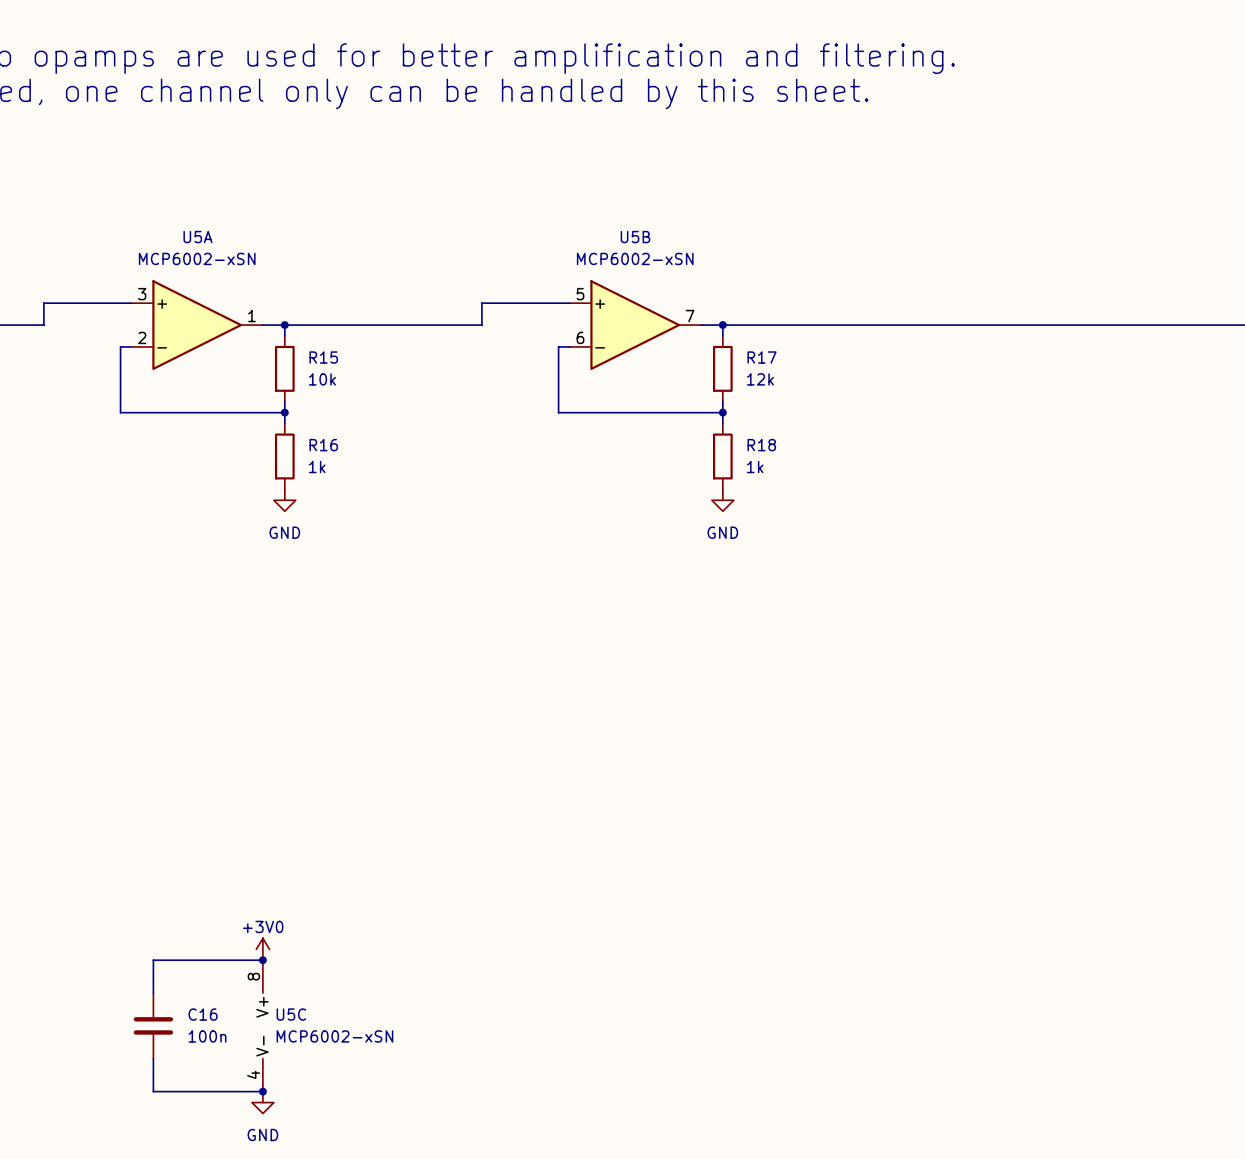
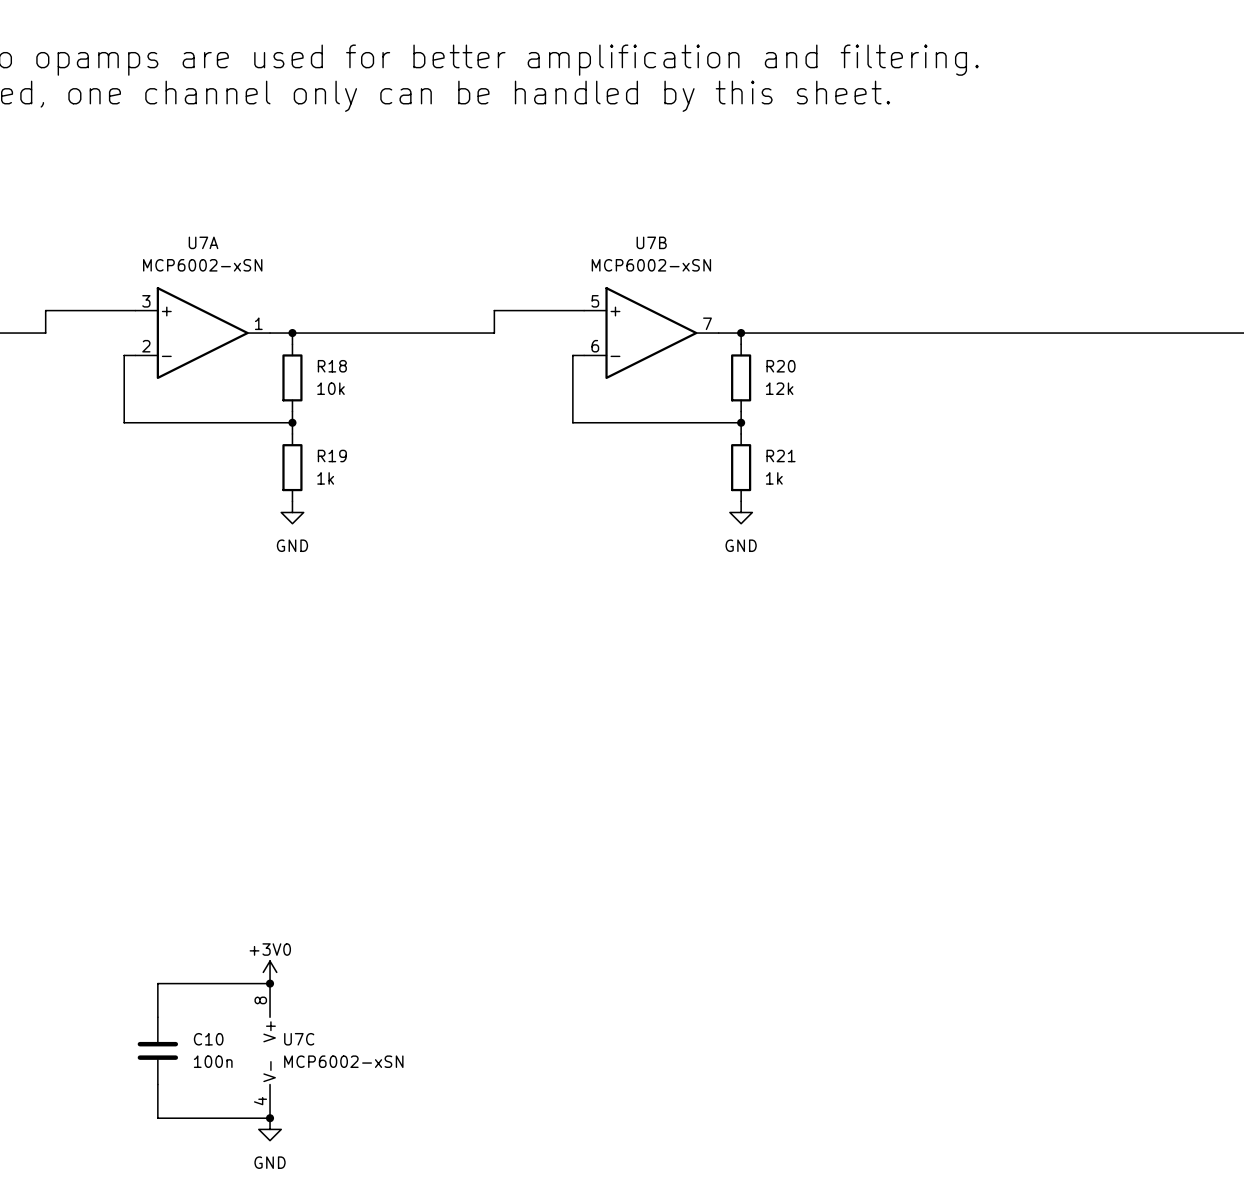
U5A name: U5A (197, 237) -> U7A (203, 242)
U5B name: U5B (635, 237) -> U7B (651, 242)
R15 name: R15 (323, 357) -> R18 (332, 366)
R17 name: R17 (762, 357) -> R20 (781, 366)
R16 name: R16 (323, 445) -> R19 (332, 455)
R18 name: R18 (761, 445) -> R21 (781, 455)
C16 name: C16 (203, 1014) -> C10 (208, 1039)
U5C name: U5C (291, 1014) -> U7C (299, 1039)

